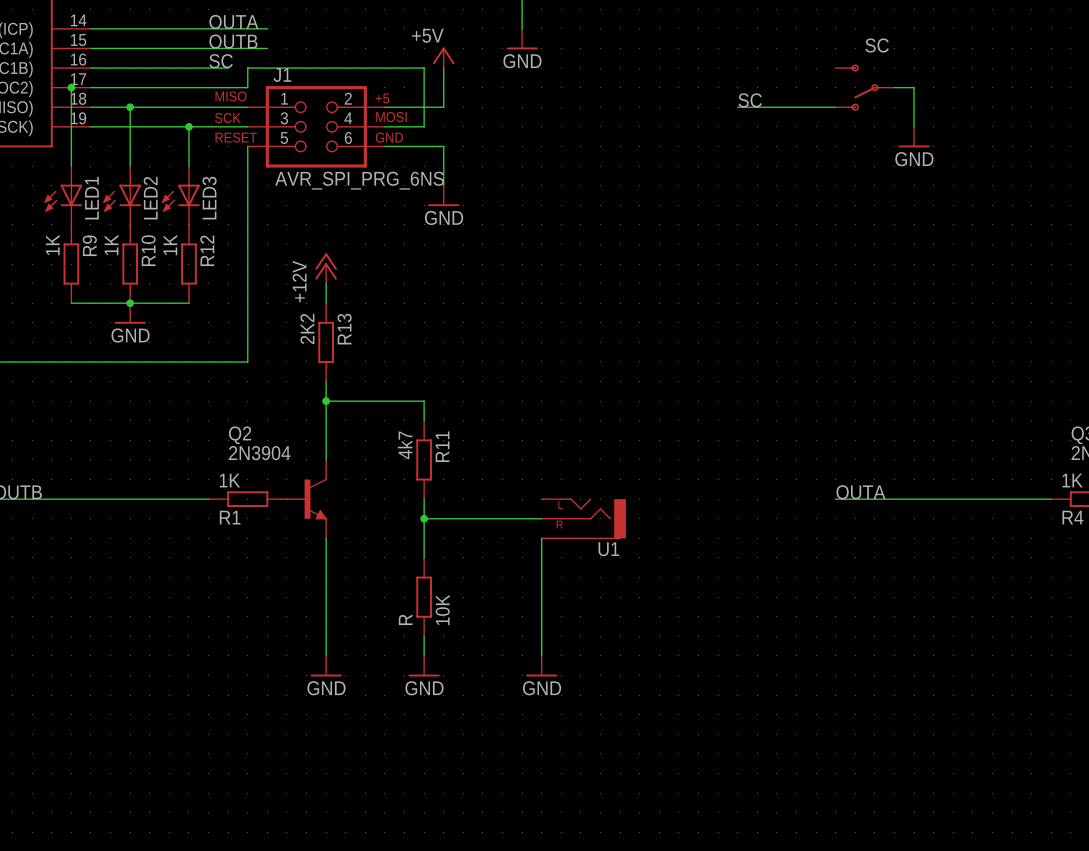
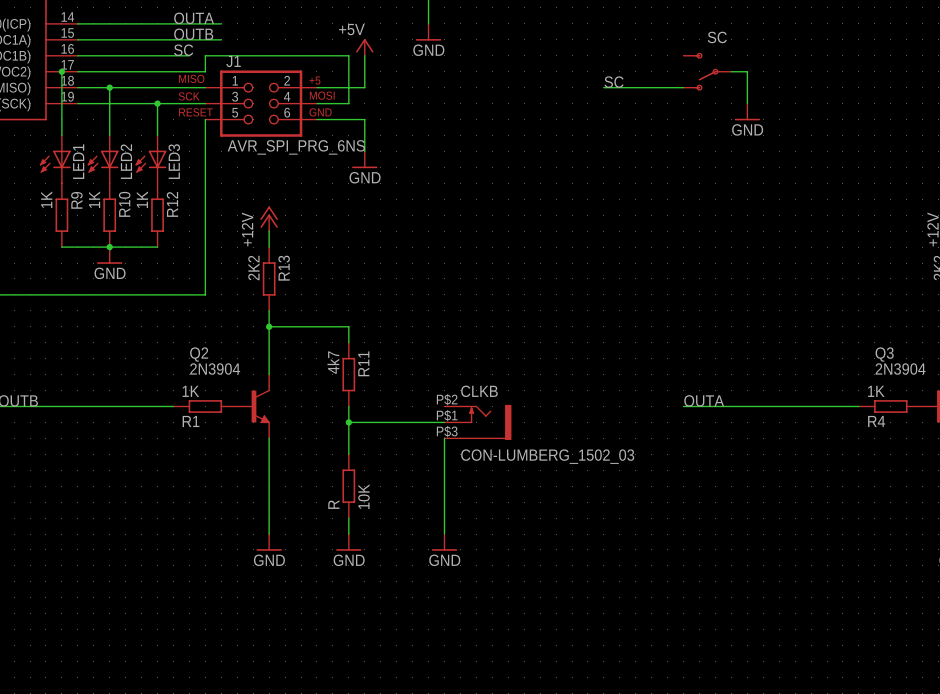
CLKB: none -> CON-LUMBERG_1502_03 (477, 422)
U1: (583, 518) -> none

